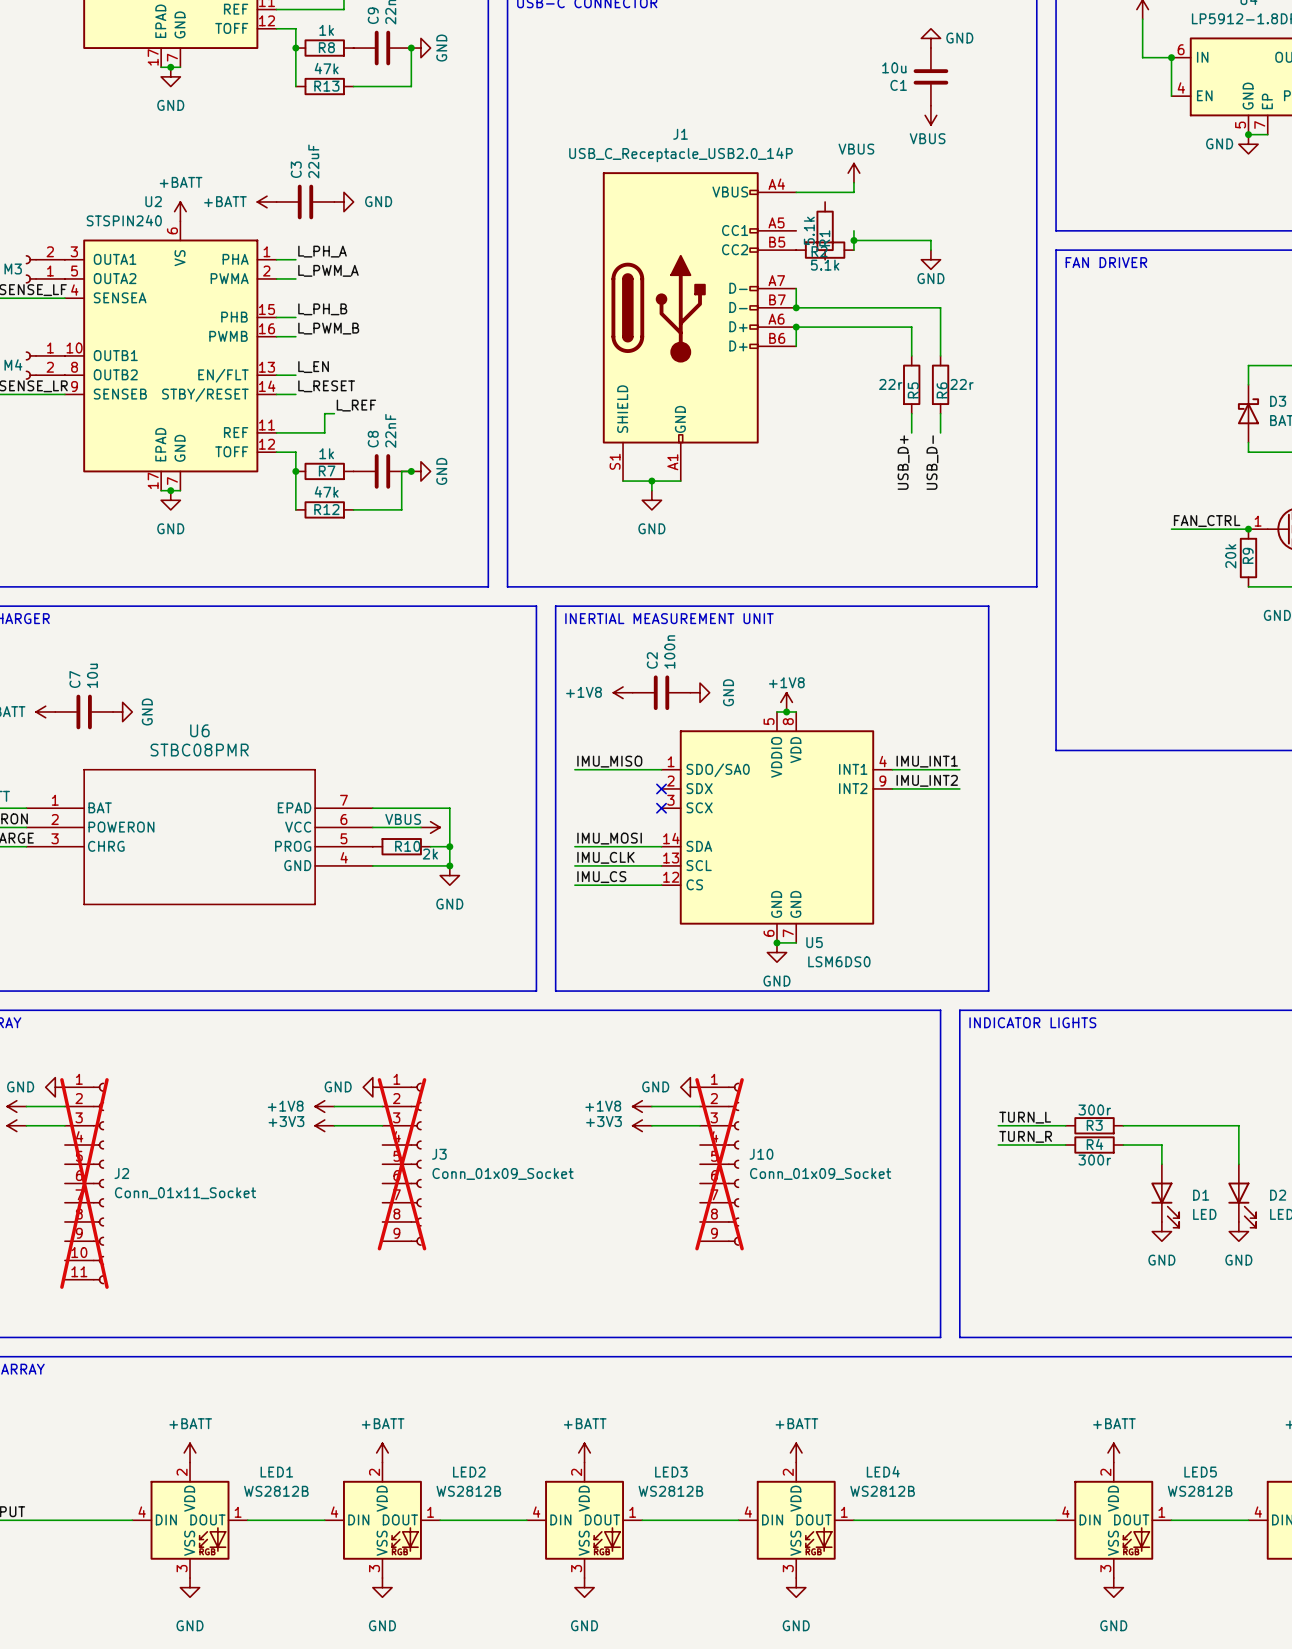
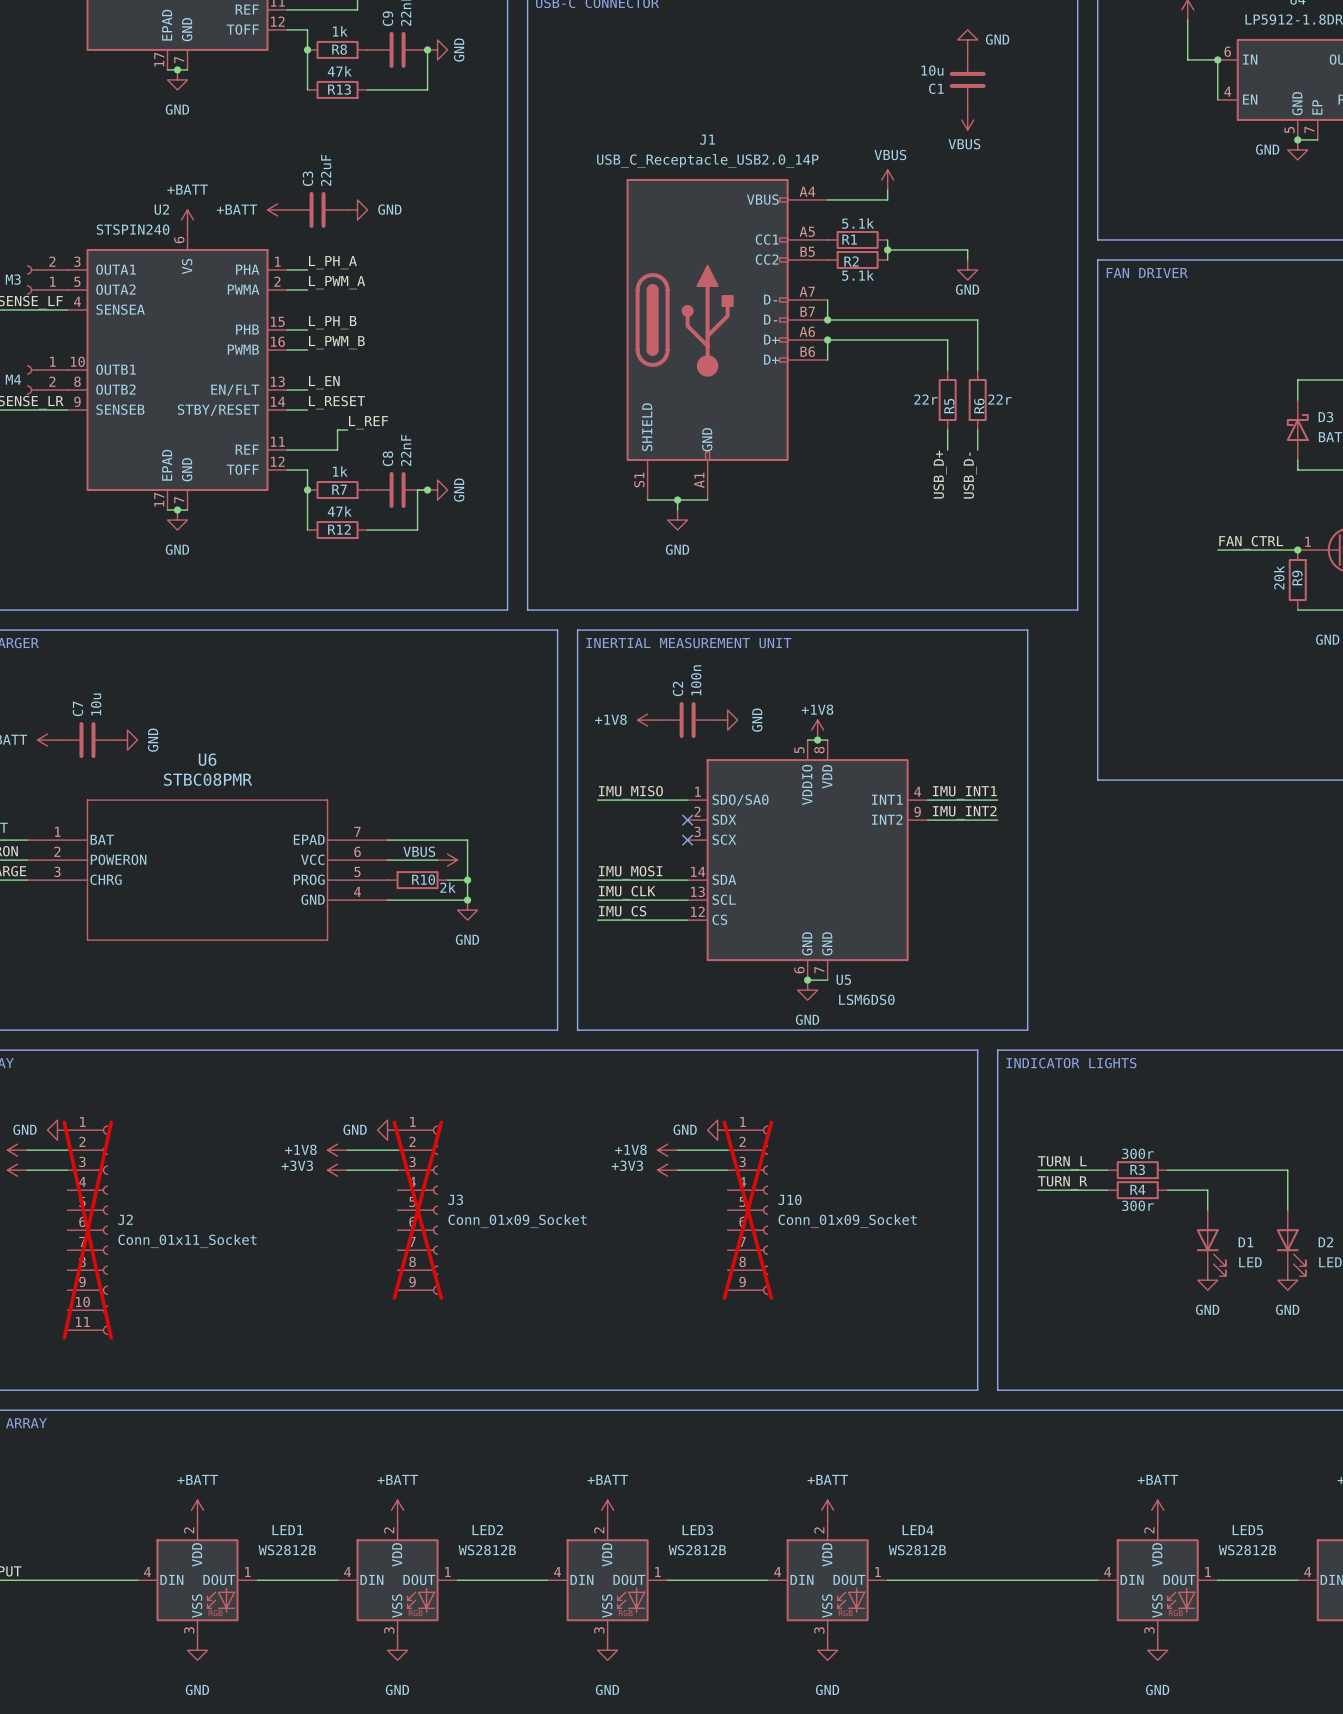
R1 rotation: 0° (825, 230) -> 90° clockwise (857, 239)

